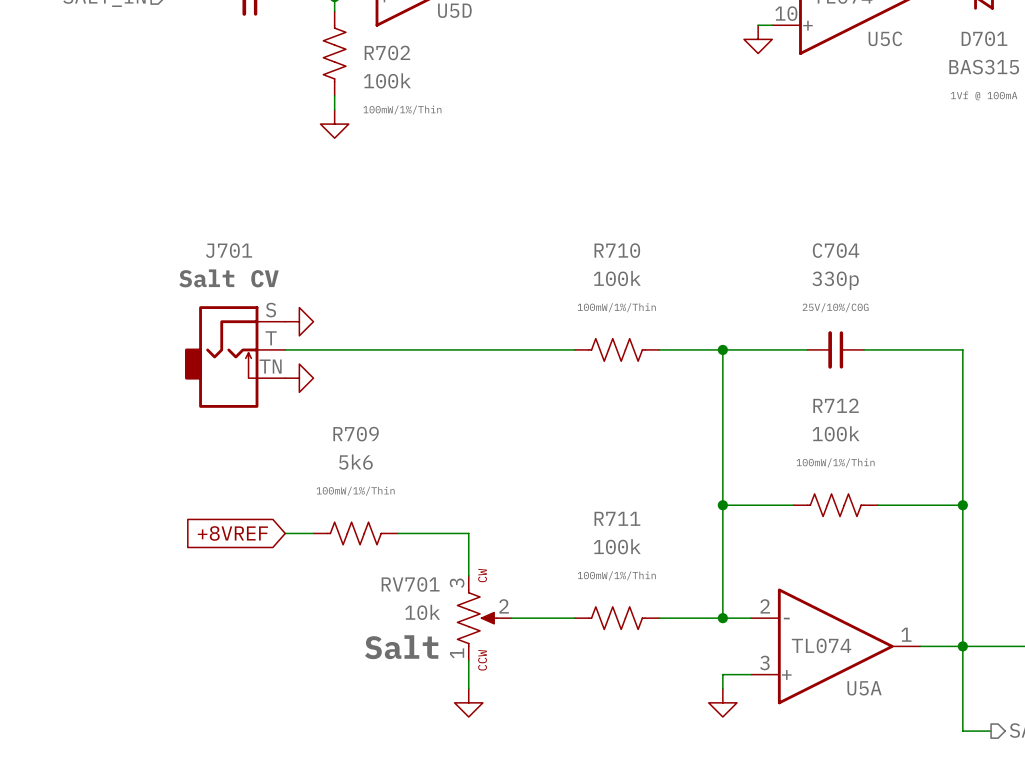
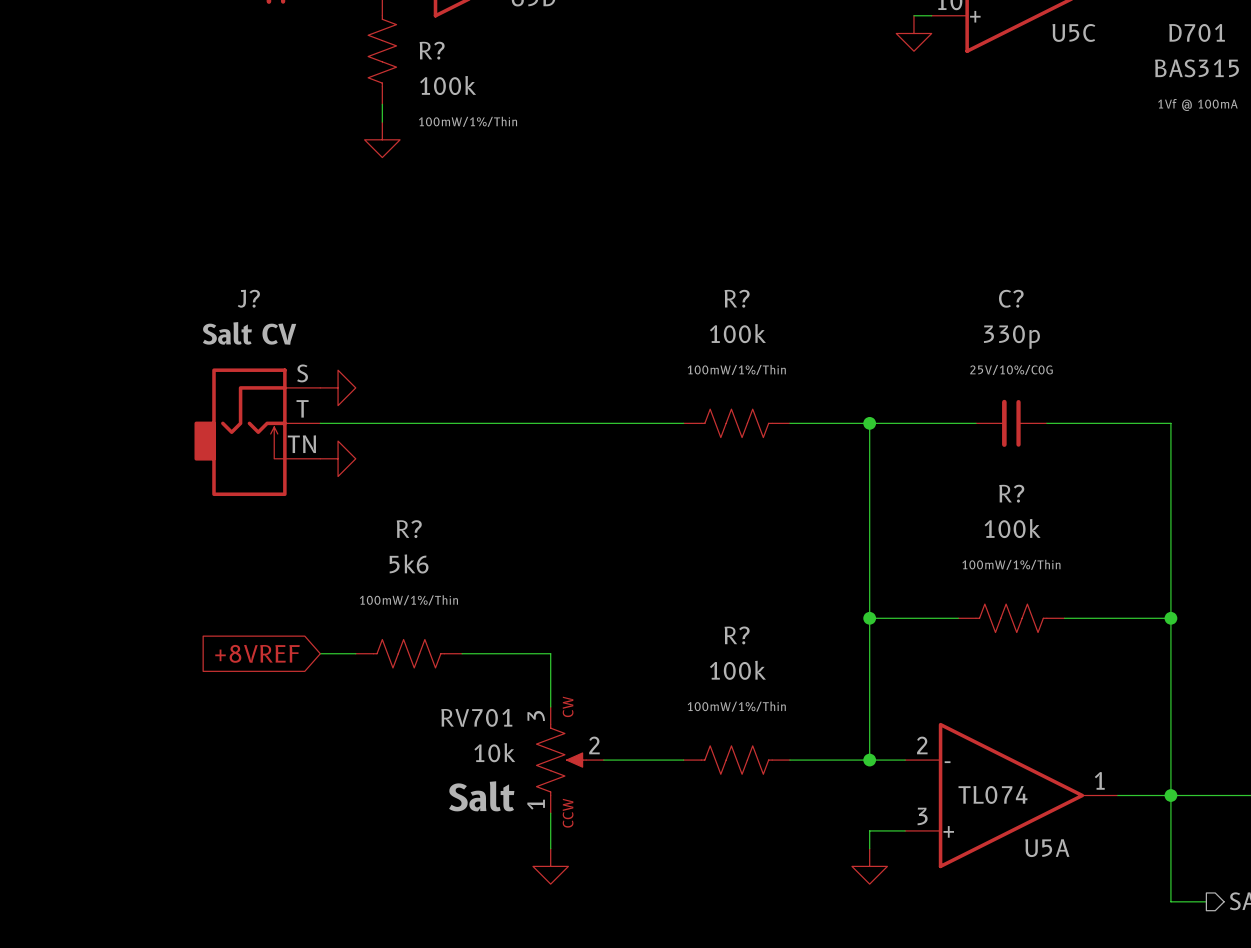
R702 name: R702 (387, 52) -> R? (432, 50)
J701 name: J701 (229, 250) -> J? (248, 298)
R710 name: R710 (617, 250) -> R? (737, 298)
C704 name: C704 (836, 250) -> C? (1011, 298)
R712 name: R712 (836, 405) -> R? (1011, 493)
R709 name: R709 (356, 434) -> R? (409, 529)
R711 name: R711 (617, 518) -> R? (737, 635)

